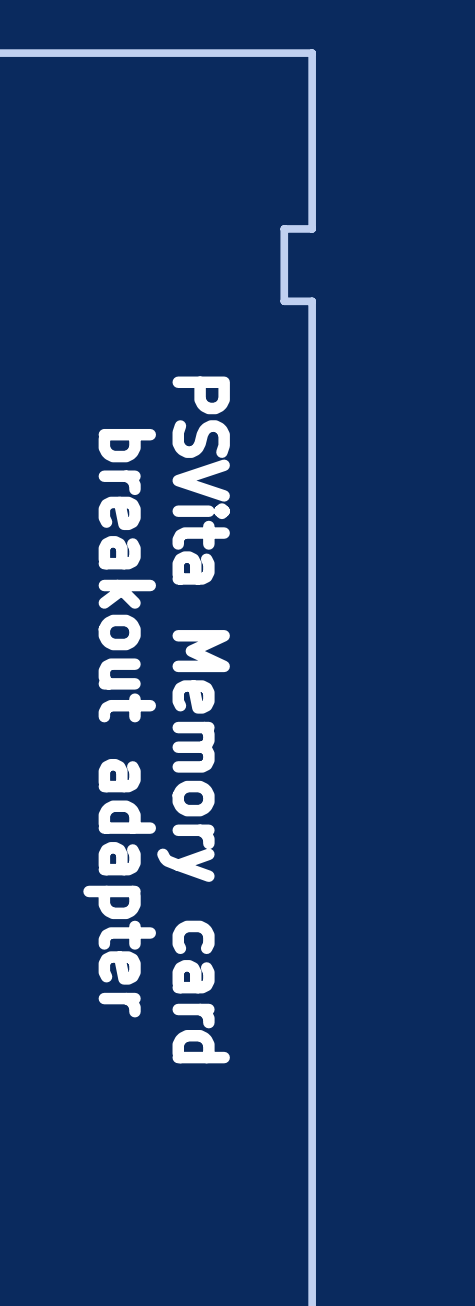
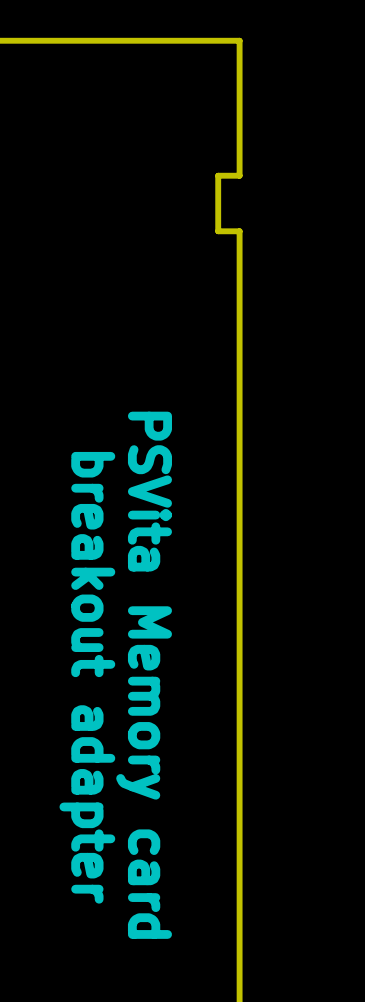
text position: PSVita Memory card (193, 719) -> PSVita Memory card (144, 675)
text position: breakout adapter (119, 723) -> breakout adapter (87, 677)

